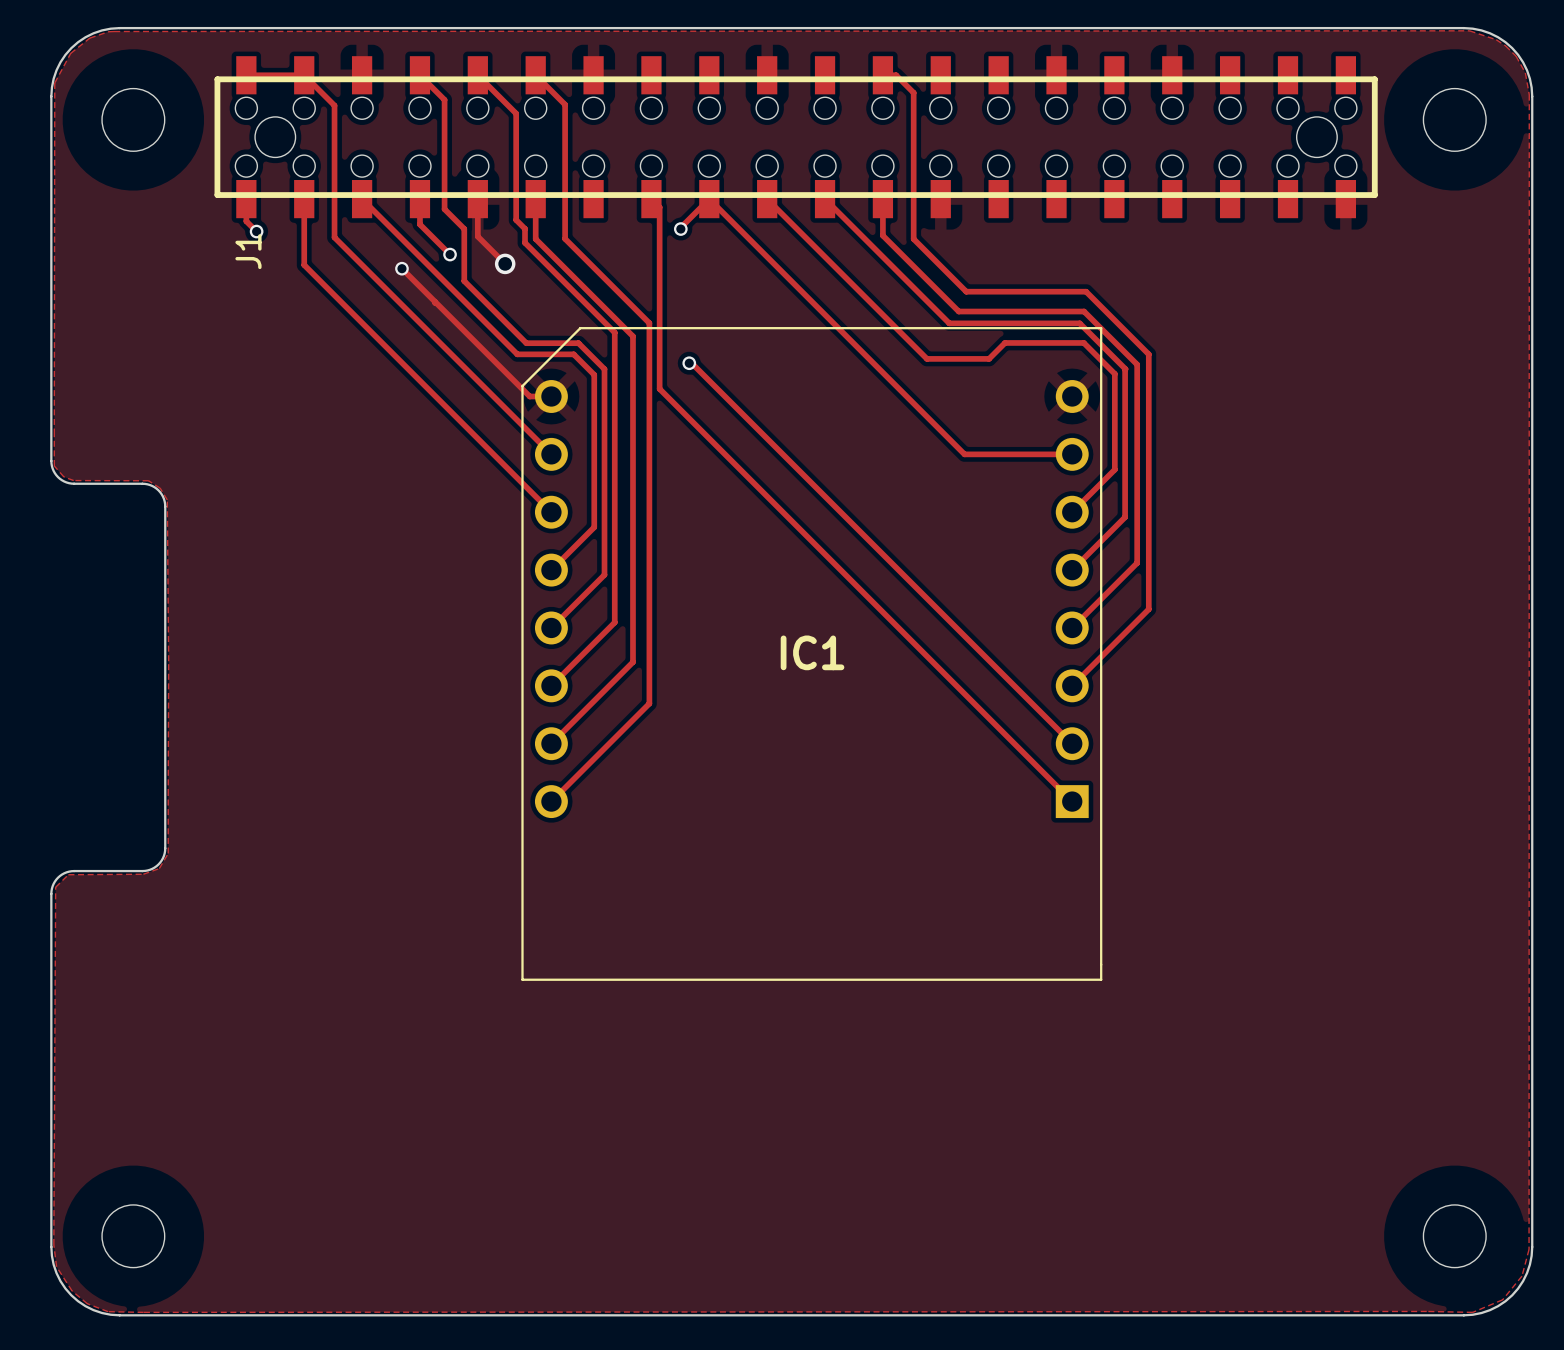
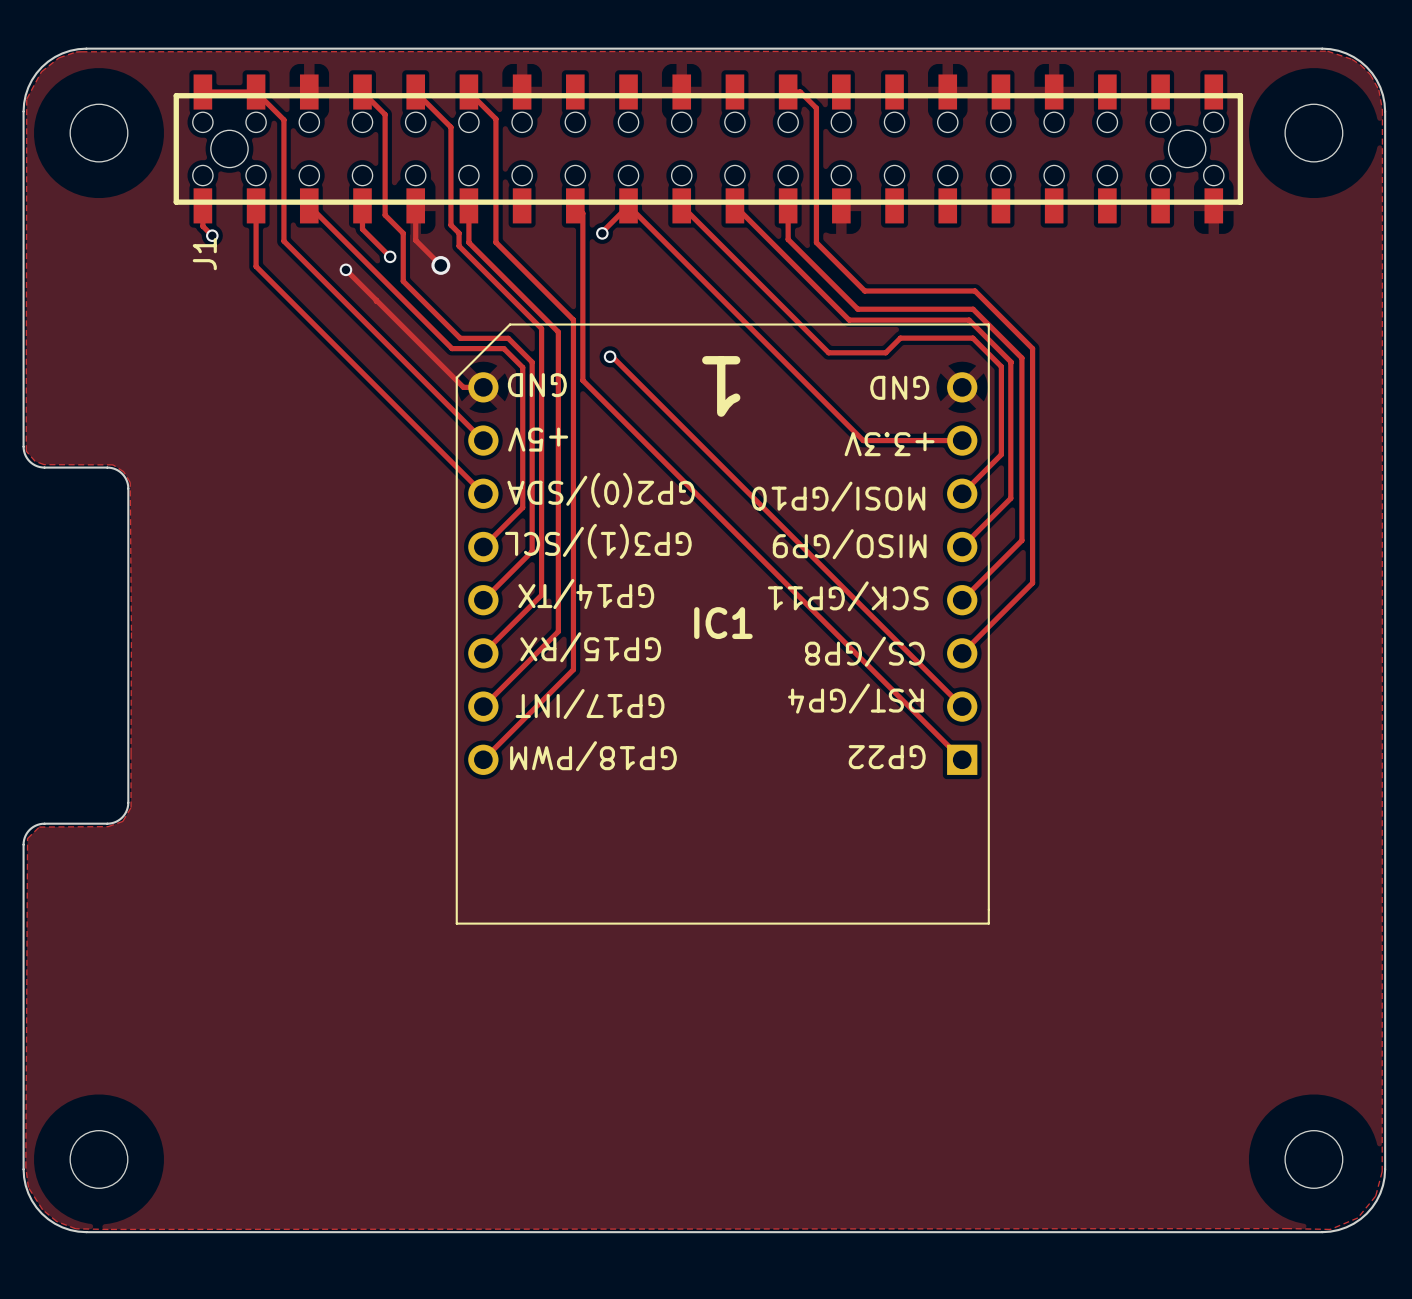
text: none -> GND (537, 385)
text: none -> 1 (721, 386)
text: none -> GND (899, 387)
text: none -> +5V (538, 439)
text: none -> +3.3V (889, 444)
text: none -> GP2(0)/SDA (601, 490)
text: none -> MOSI/GP10 (838, 496)
text: none -> GP3(1)/SCL (598, 541)
text: none -> MISO/GP9 (849, 544)
text: none -> GP14/TX (586, 594)
text: none -> SCK/GP11 (848, 596)
text: none -> GP15/RX (590, 647)
text: none -> CS/GP8 (864, 651)
text: none -> RST/GP4 (855, 698)
text: none -> GP17/INT (590, 704)
text: none -> GP18/PWM (593, 756)
text: none -> GP22 (887, 757)

